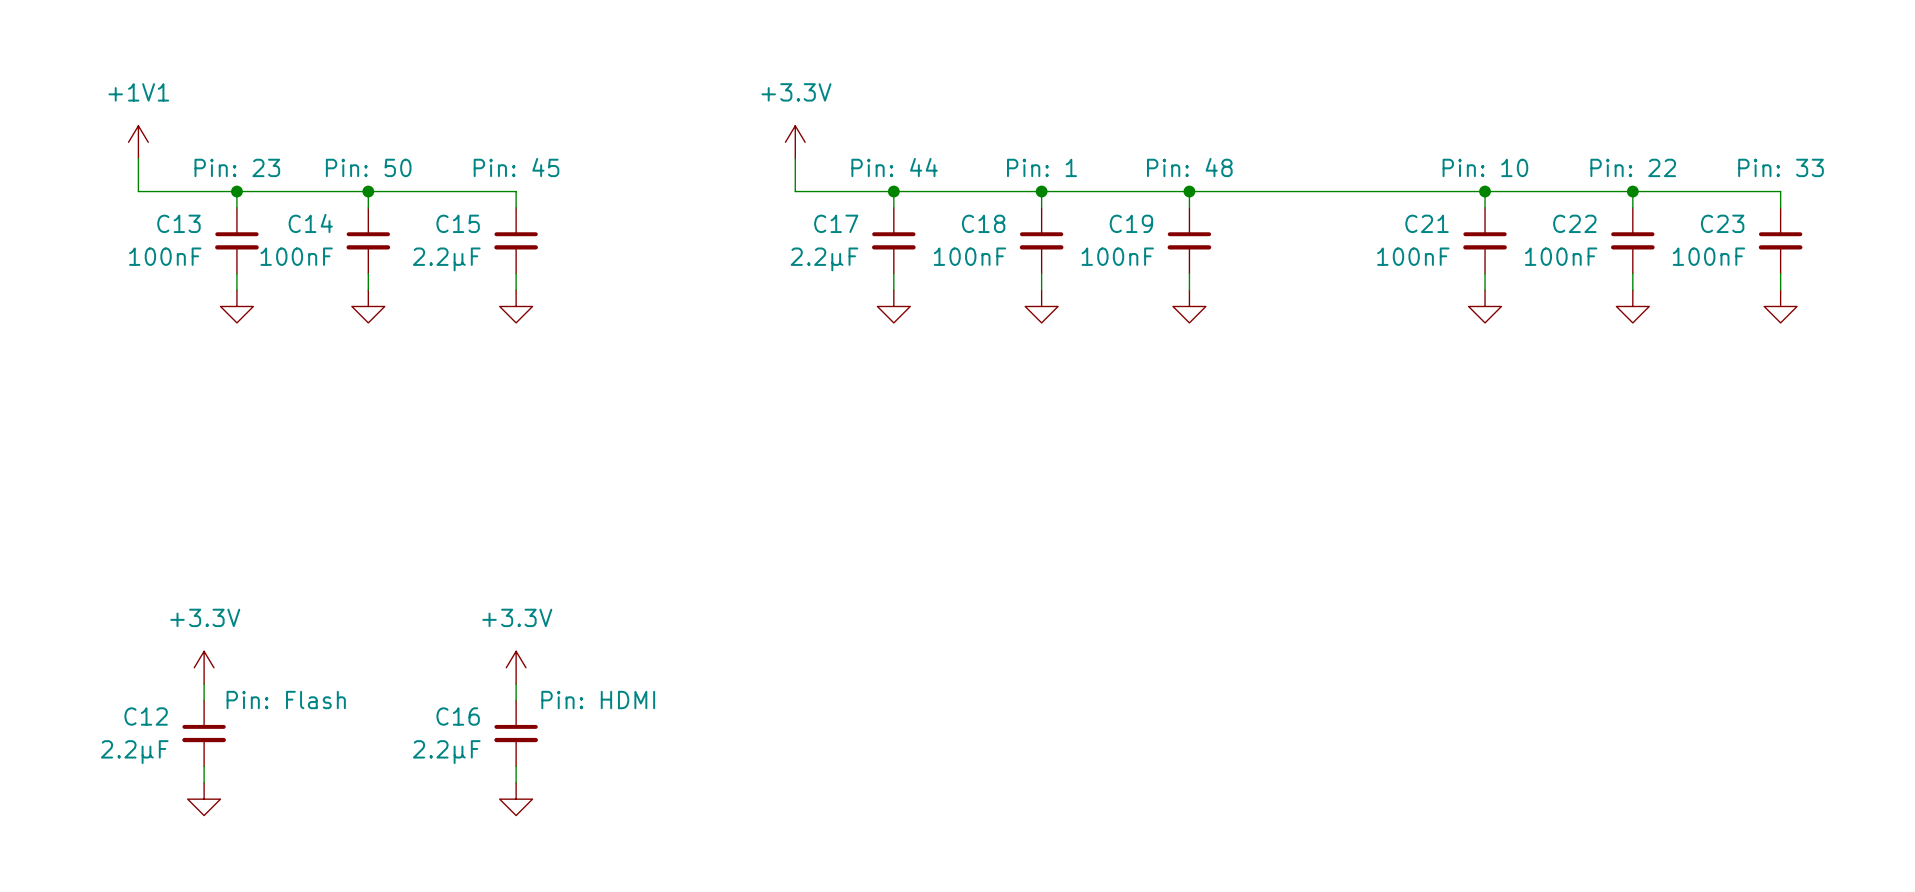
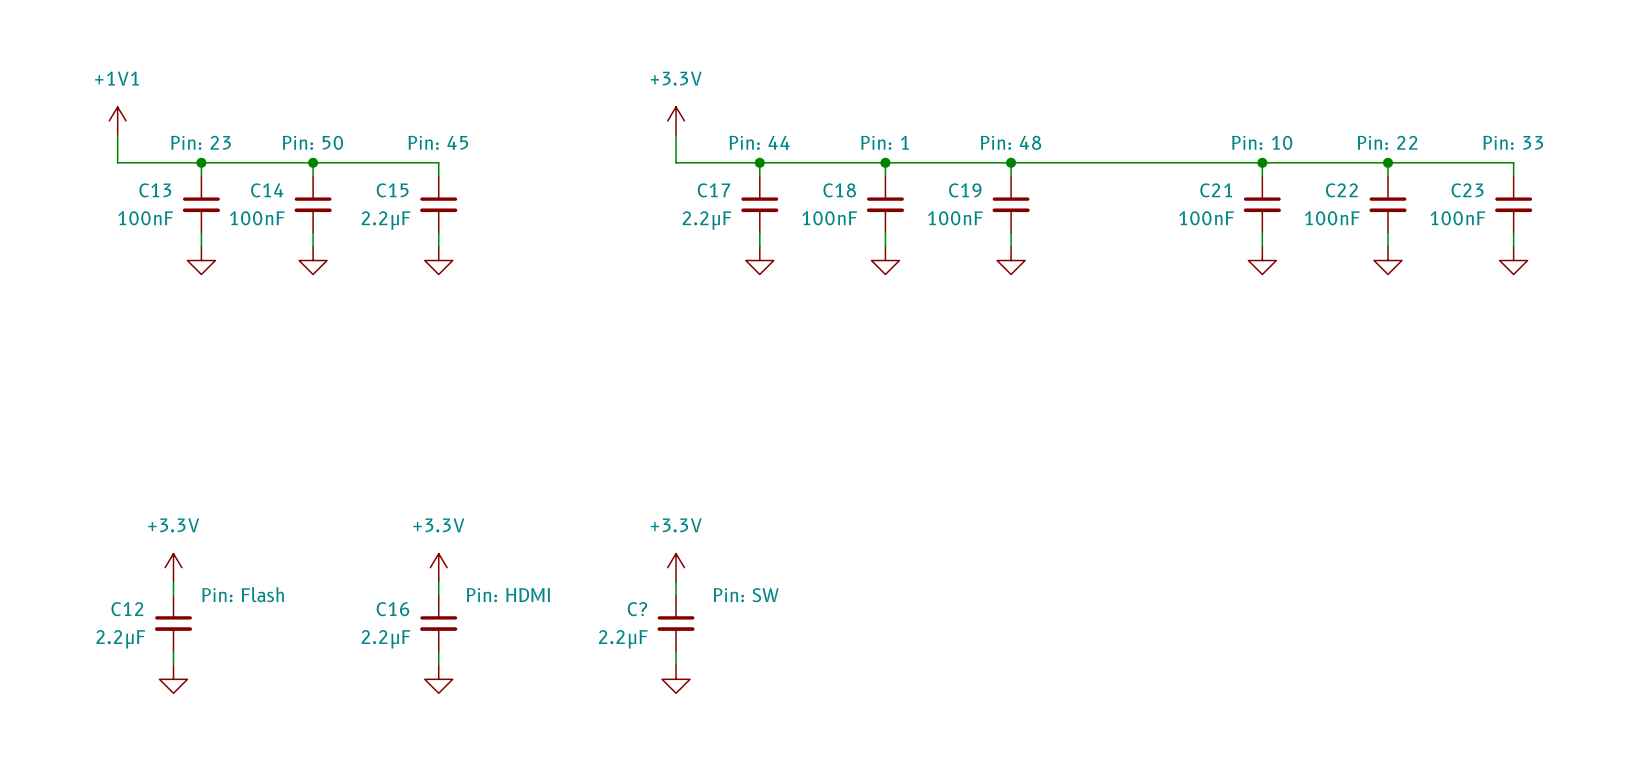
power symbol: none -> +3.3V (676, 567)
wire: none -> (676, 581) (676, 595)
C?: none -> 2.2μF (676, 623)
wire: none -> (676, 651) (676, 665)
power symbol: none -> (676, 679)

